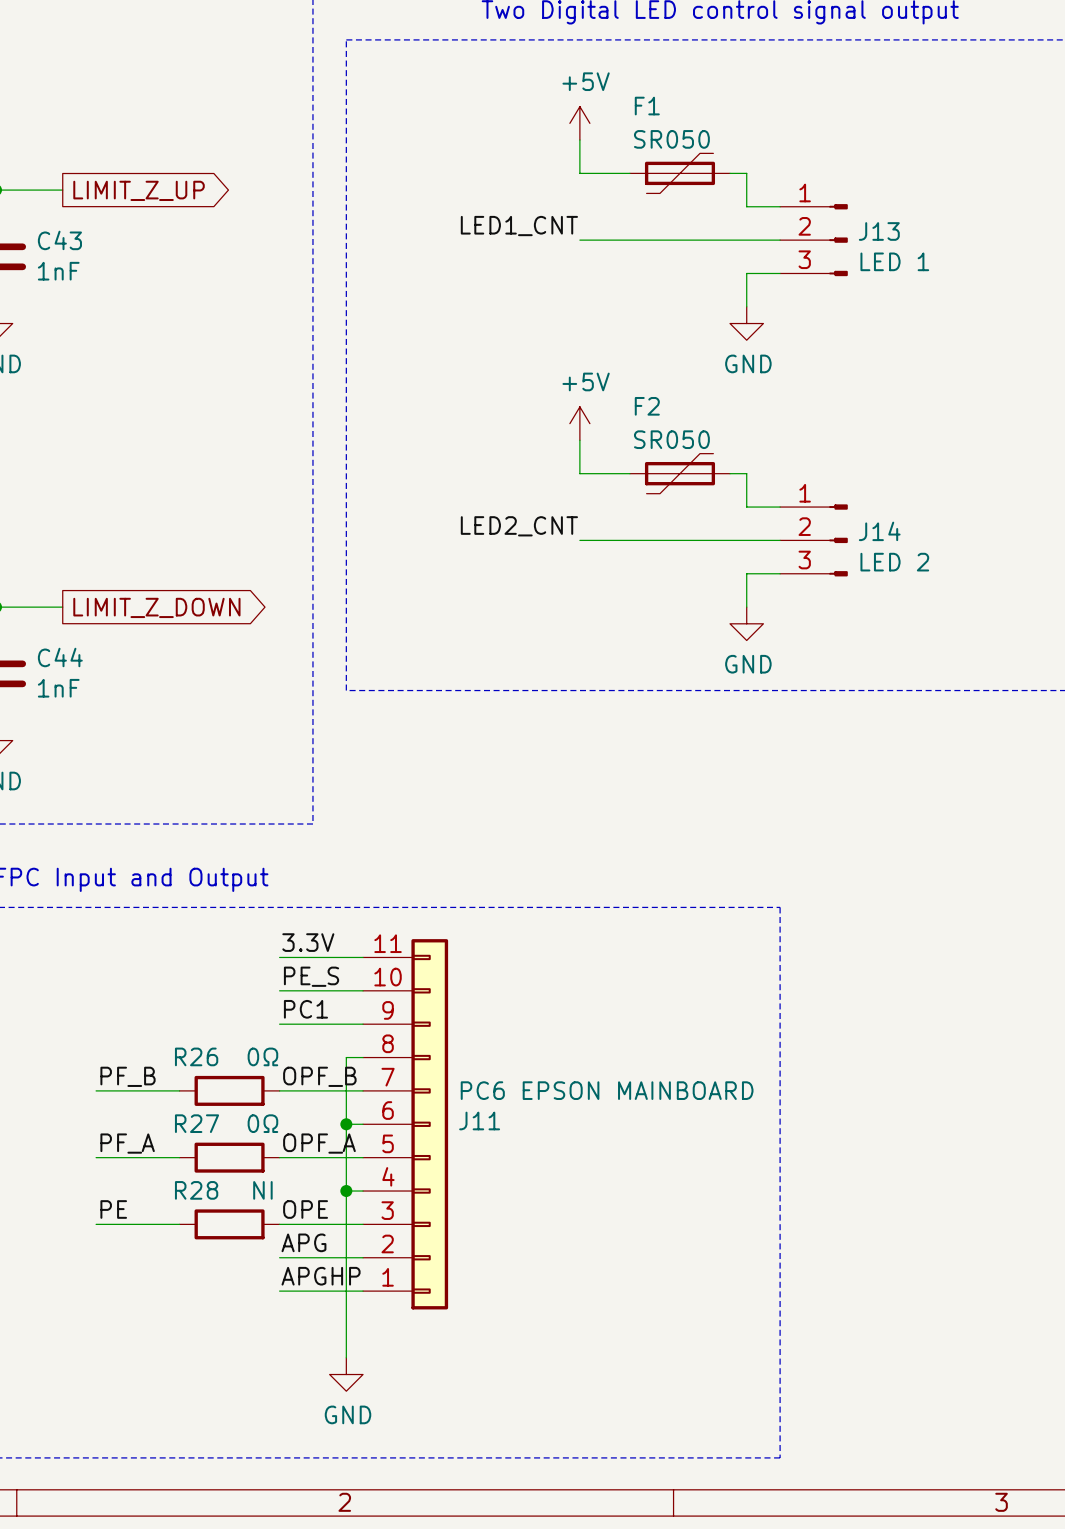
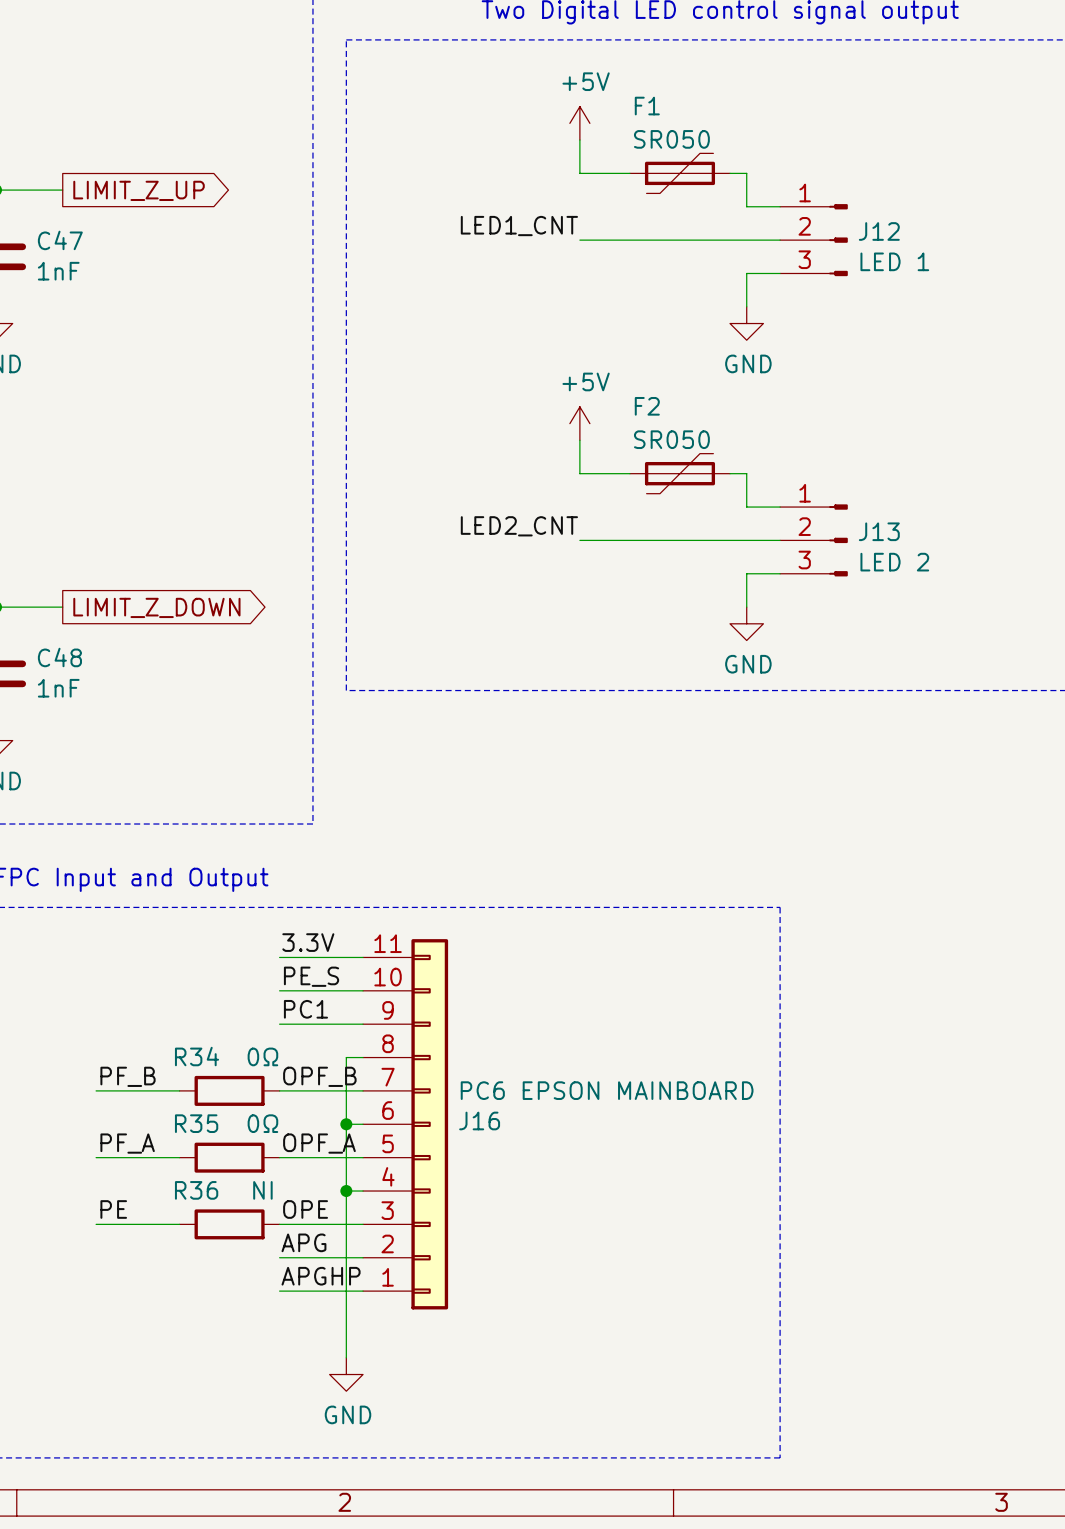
J13 name: J13 (879, 231) -> J12 (879, 231)
C43 name: C43 (59, 240) -> C47 (60, 240)
J14 name: J14 (879, 531) -> J13 (879, 531)
C44 name: C44 (60, 657) -> C48 (59, 657)
R26 name: R26 (196, 1056) -> R34 (196, 1056)
J11 name: J11 (479, 1120) -> J16 (479, 1120)
R27 name: R27 (196, 1123) -> R35 (196, 1123)
R28 name: R28 (196, 1190) -> R36 (196, 1190)

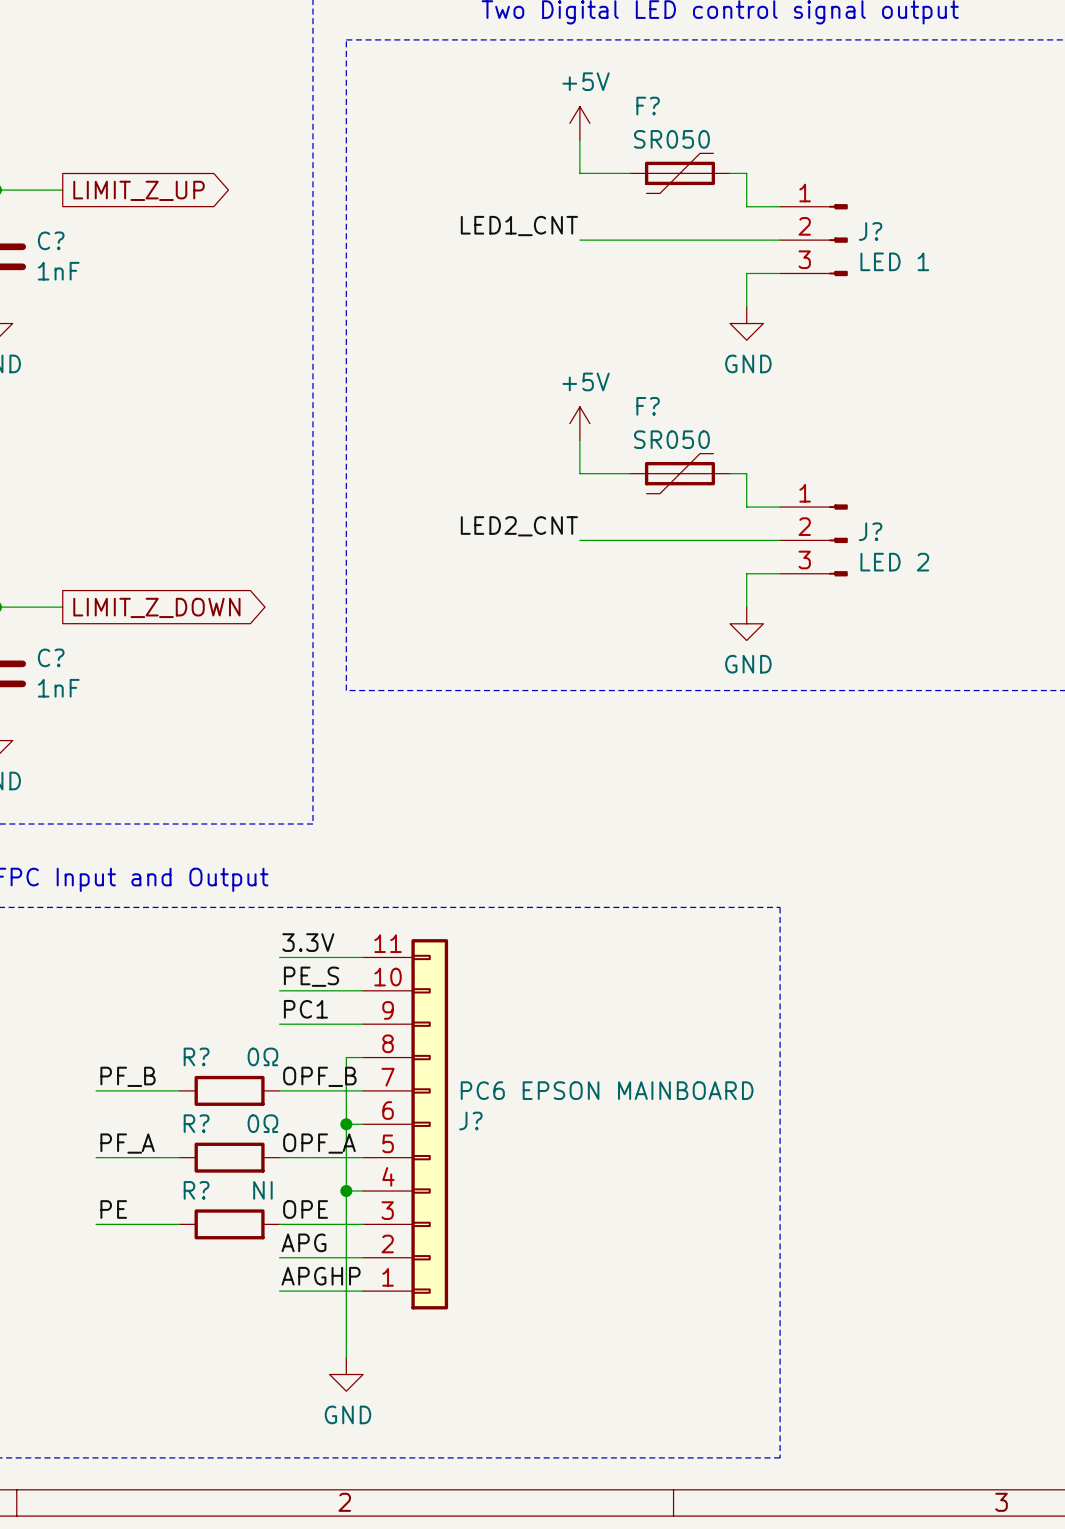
F1 name: F1 (647, 106) -> F? (648, 106)
J12 name: J12 (879, 231) -> J? (870, 231)
C47 name: C47 (60, 240) -> C? (51, 240)
F2 name: F2 (647, 406) -> F? (648, 406)
J13 name: J13 (879, 531) -> J? (870, 531)
C48 name: C48 (59, 657) -> C? (51, 657)
R34 name: R34 (196, 1056) -> R? (196, 1056)
J16 name: J16 (479, 1120) -> J? (470, 1120)
R35 name: R35 (196, 1123) -> R? (196, 1123)
R36 name: R36 (196, 1190) -> R? (196, 1190)

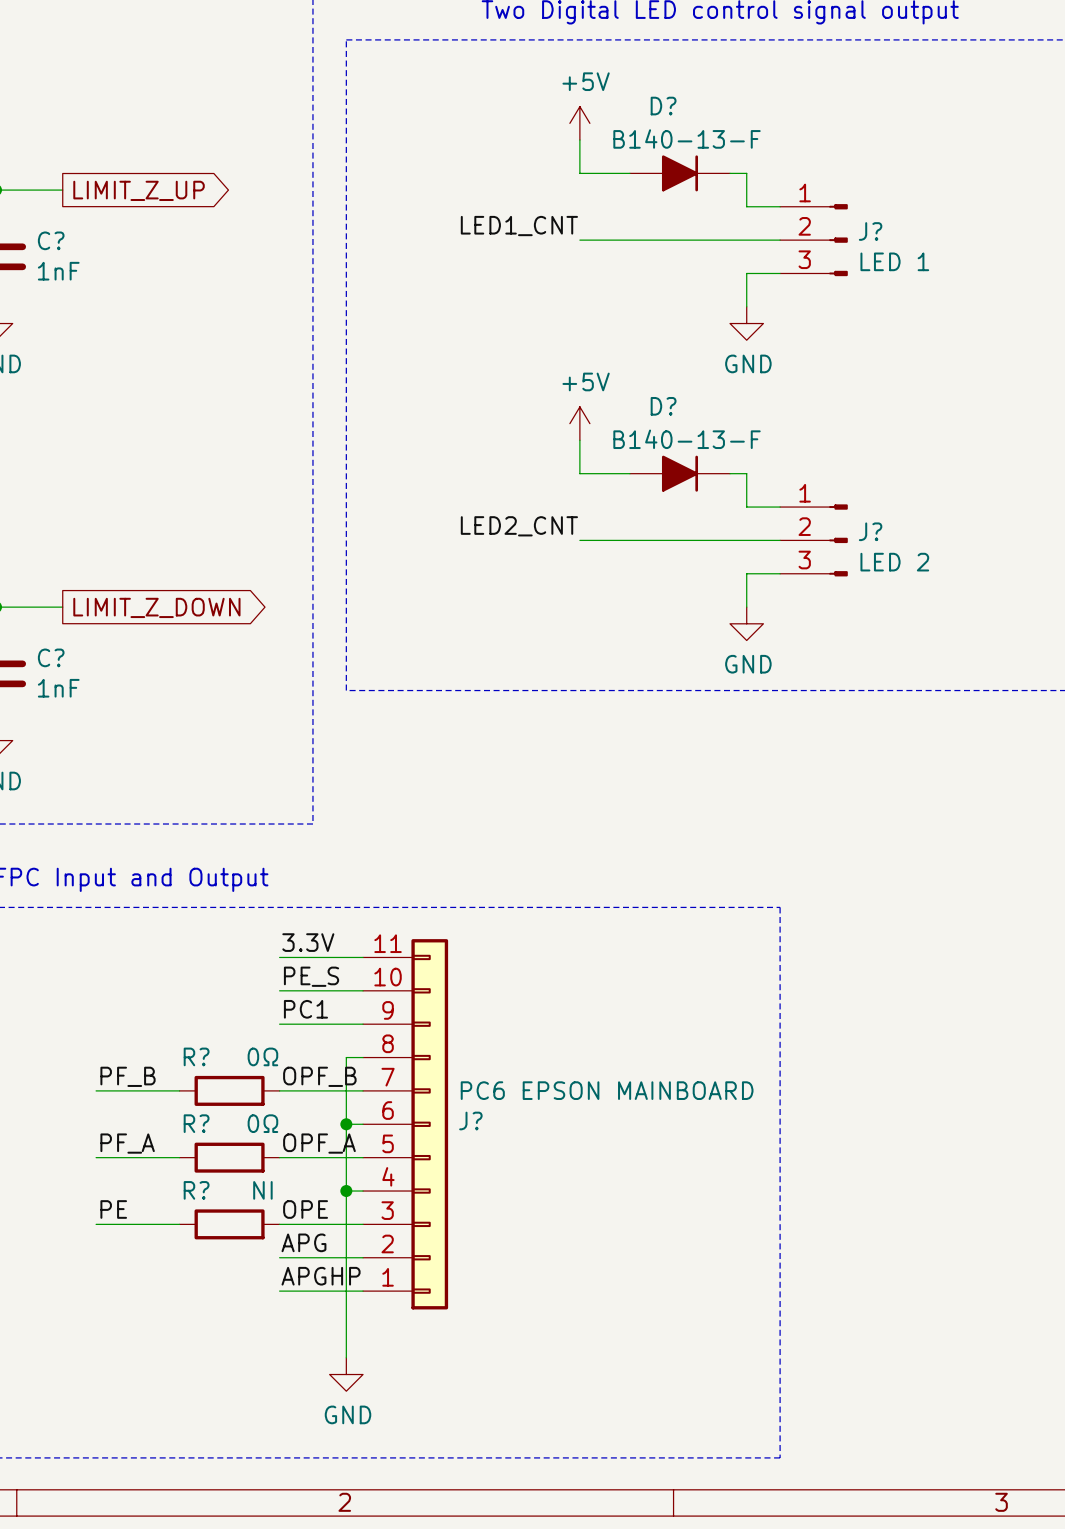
F?: SR050 (679, 173) -> none
D?: none -> B140-13-F (679, 173)
F?: SR050 (679, 473) -> none
D?: none -> B140-13-F (679, 473)

